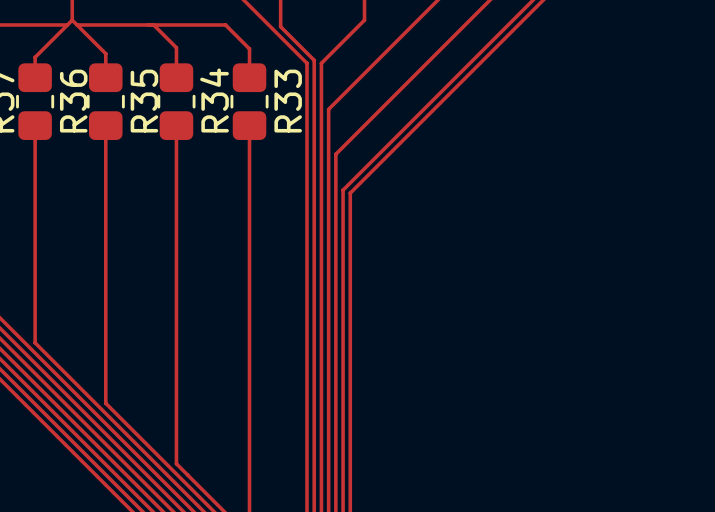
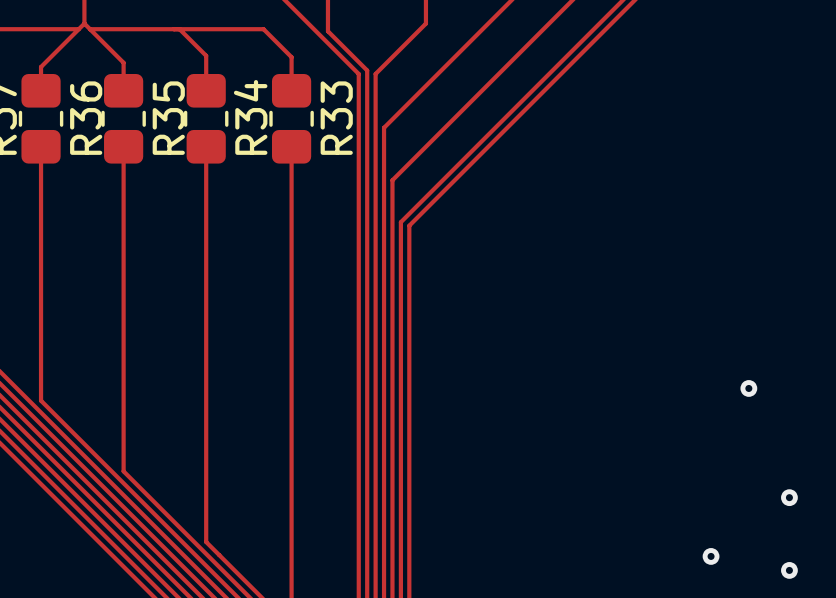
via: none -> (748, 388)
via: none -> (789, 497)
via: none -> (711, 556)
via: none -> (789, 570)

